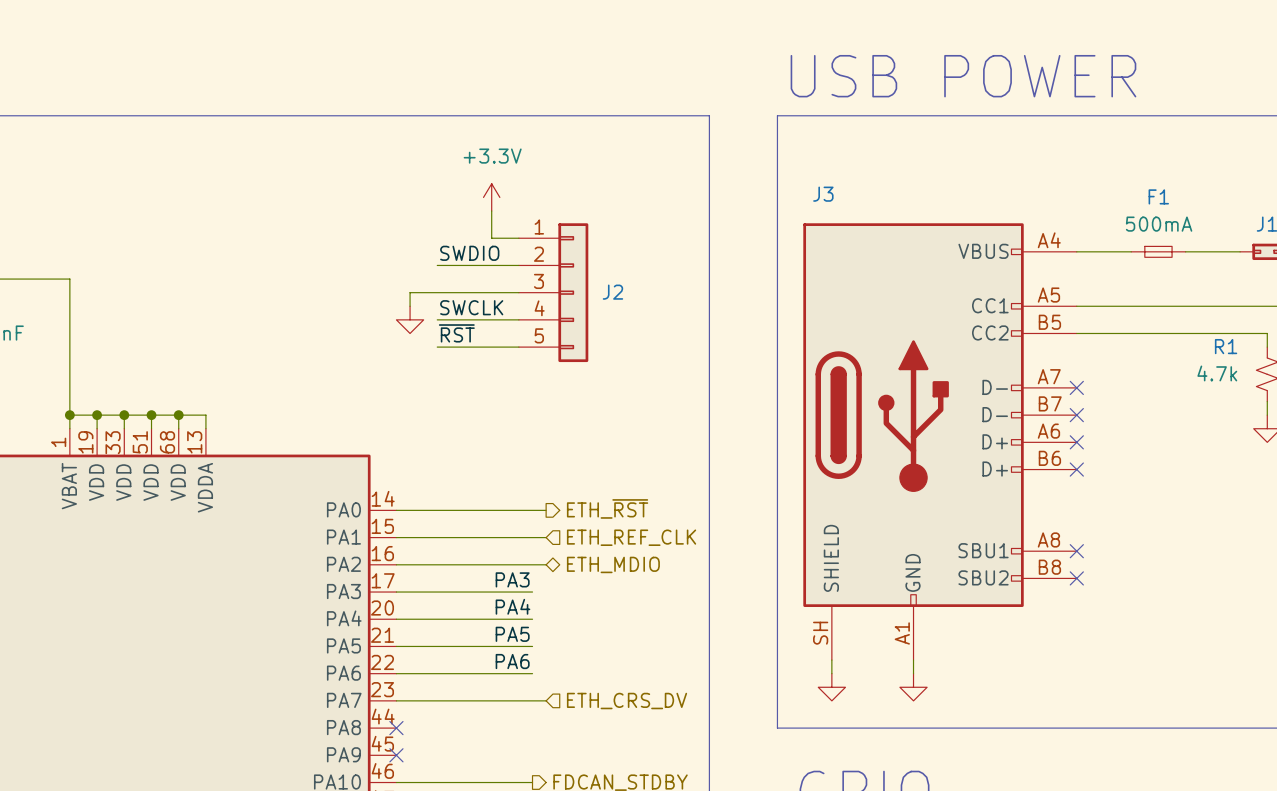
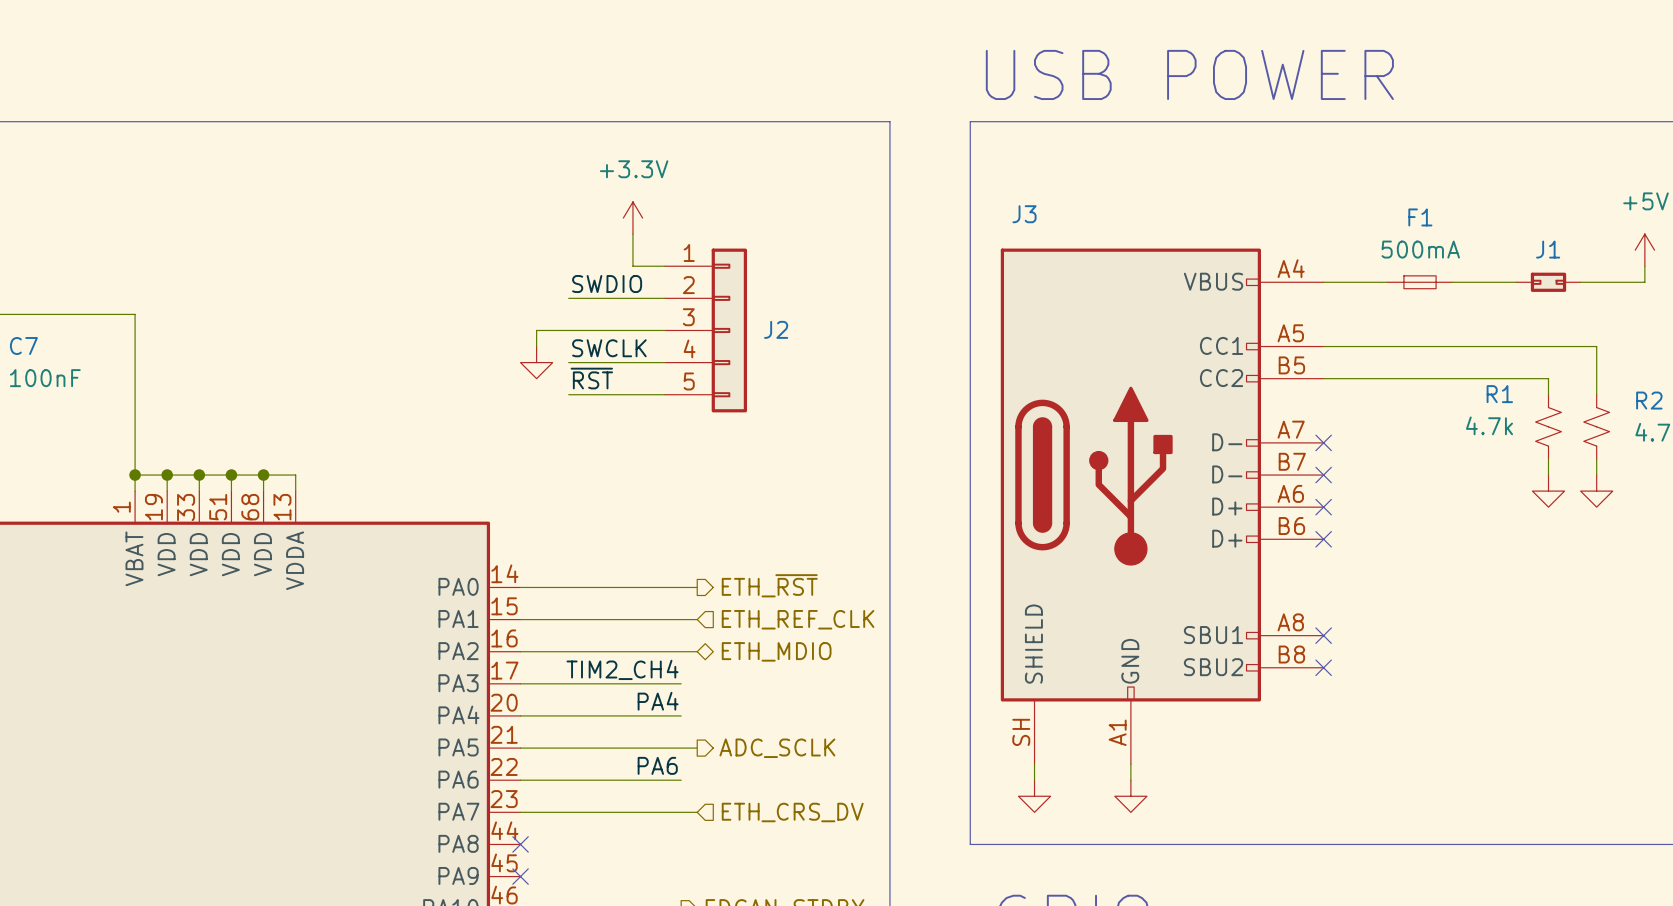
label: PA3 (512, 579) -> TIM2_CH4 (622, 669)
label: PA5 (512, 634) -> none
wire: none -> (681, 748) (697, 748)
hierarchical label: none -> ADC_SCLK (777, 748)

